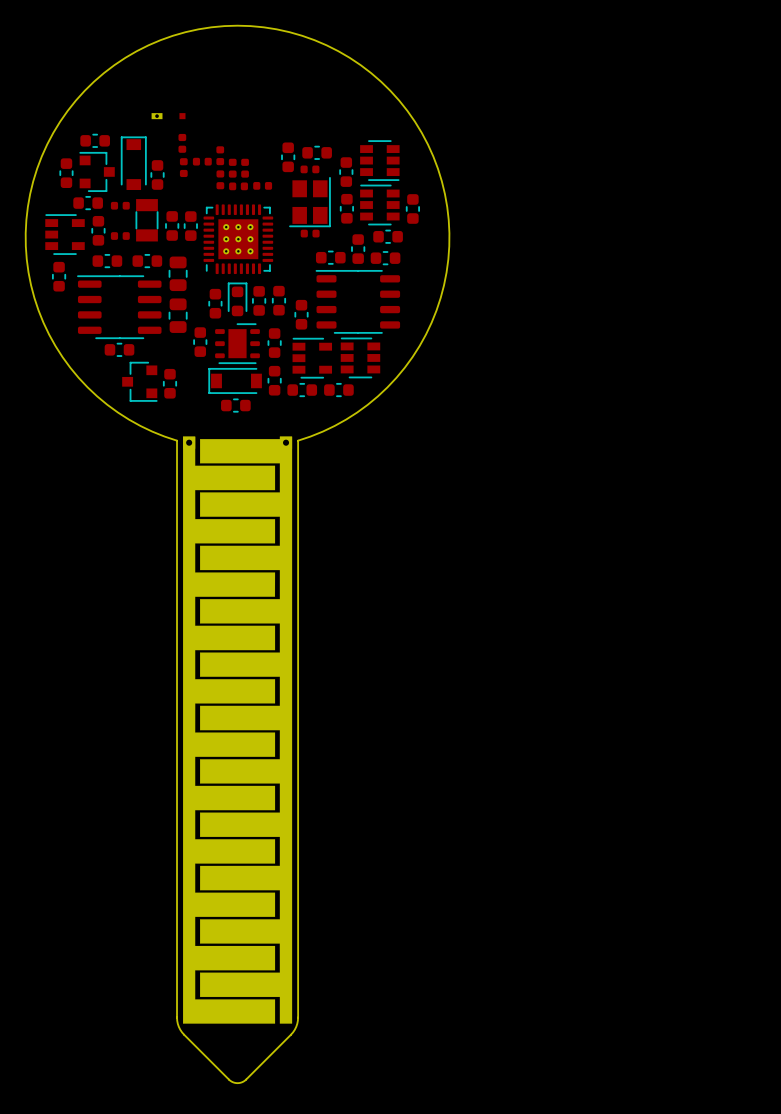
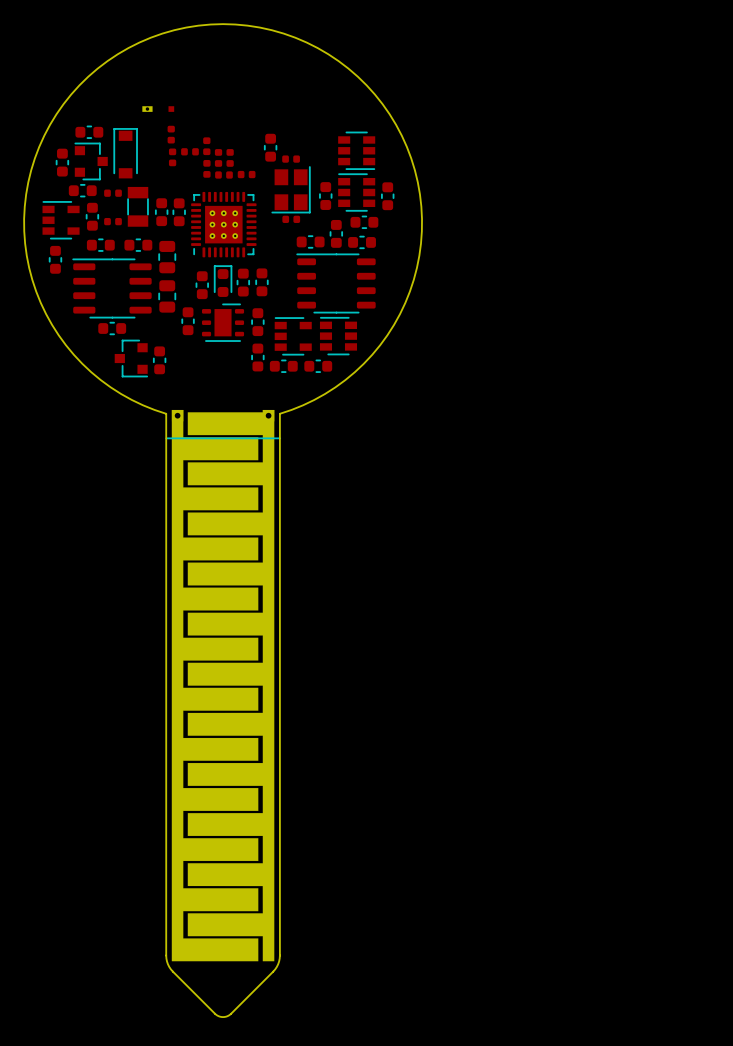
part: (317, 152) -> none
part: (346, 172) -> none
part: (157, 174) -> none
part: (301, 314) -> none
part: (235, 380) -> none
part: (235, 405) -> none
line: none -> (166, 438) (280, 438)

